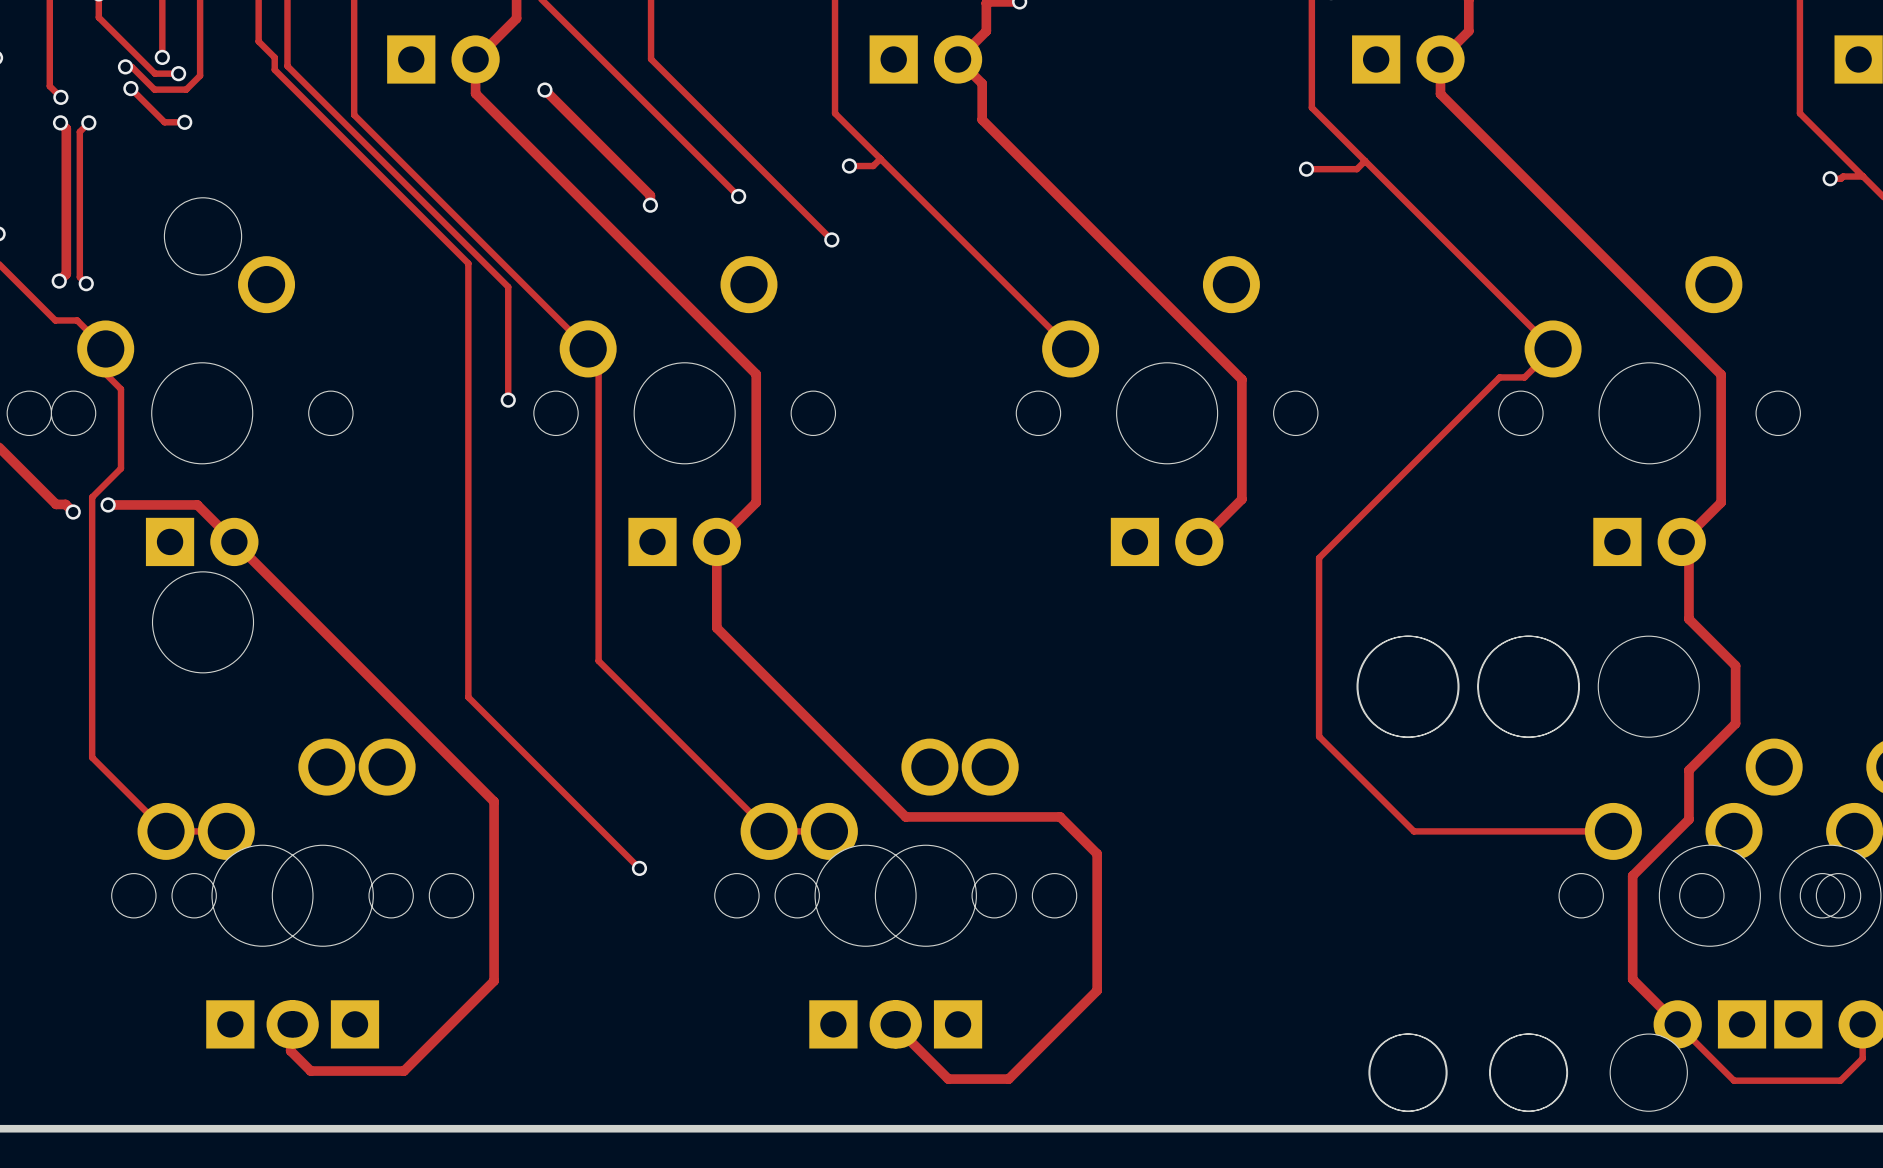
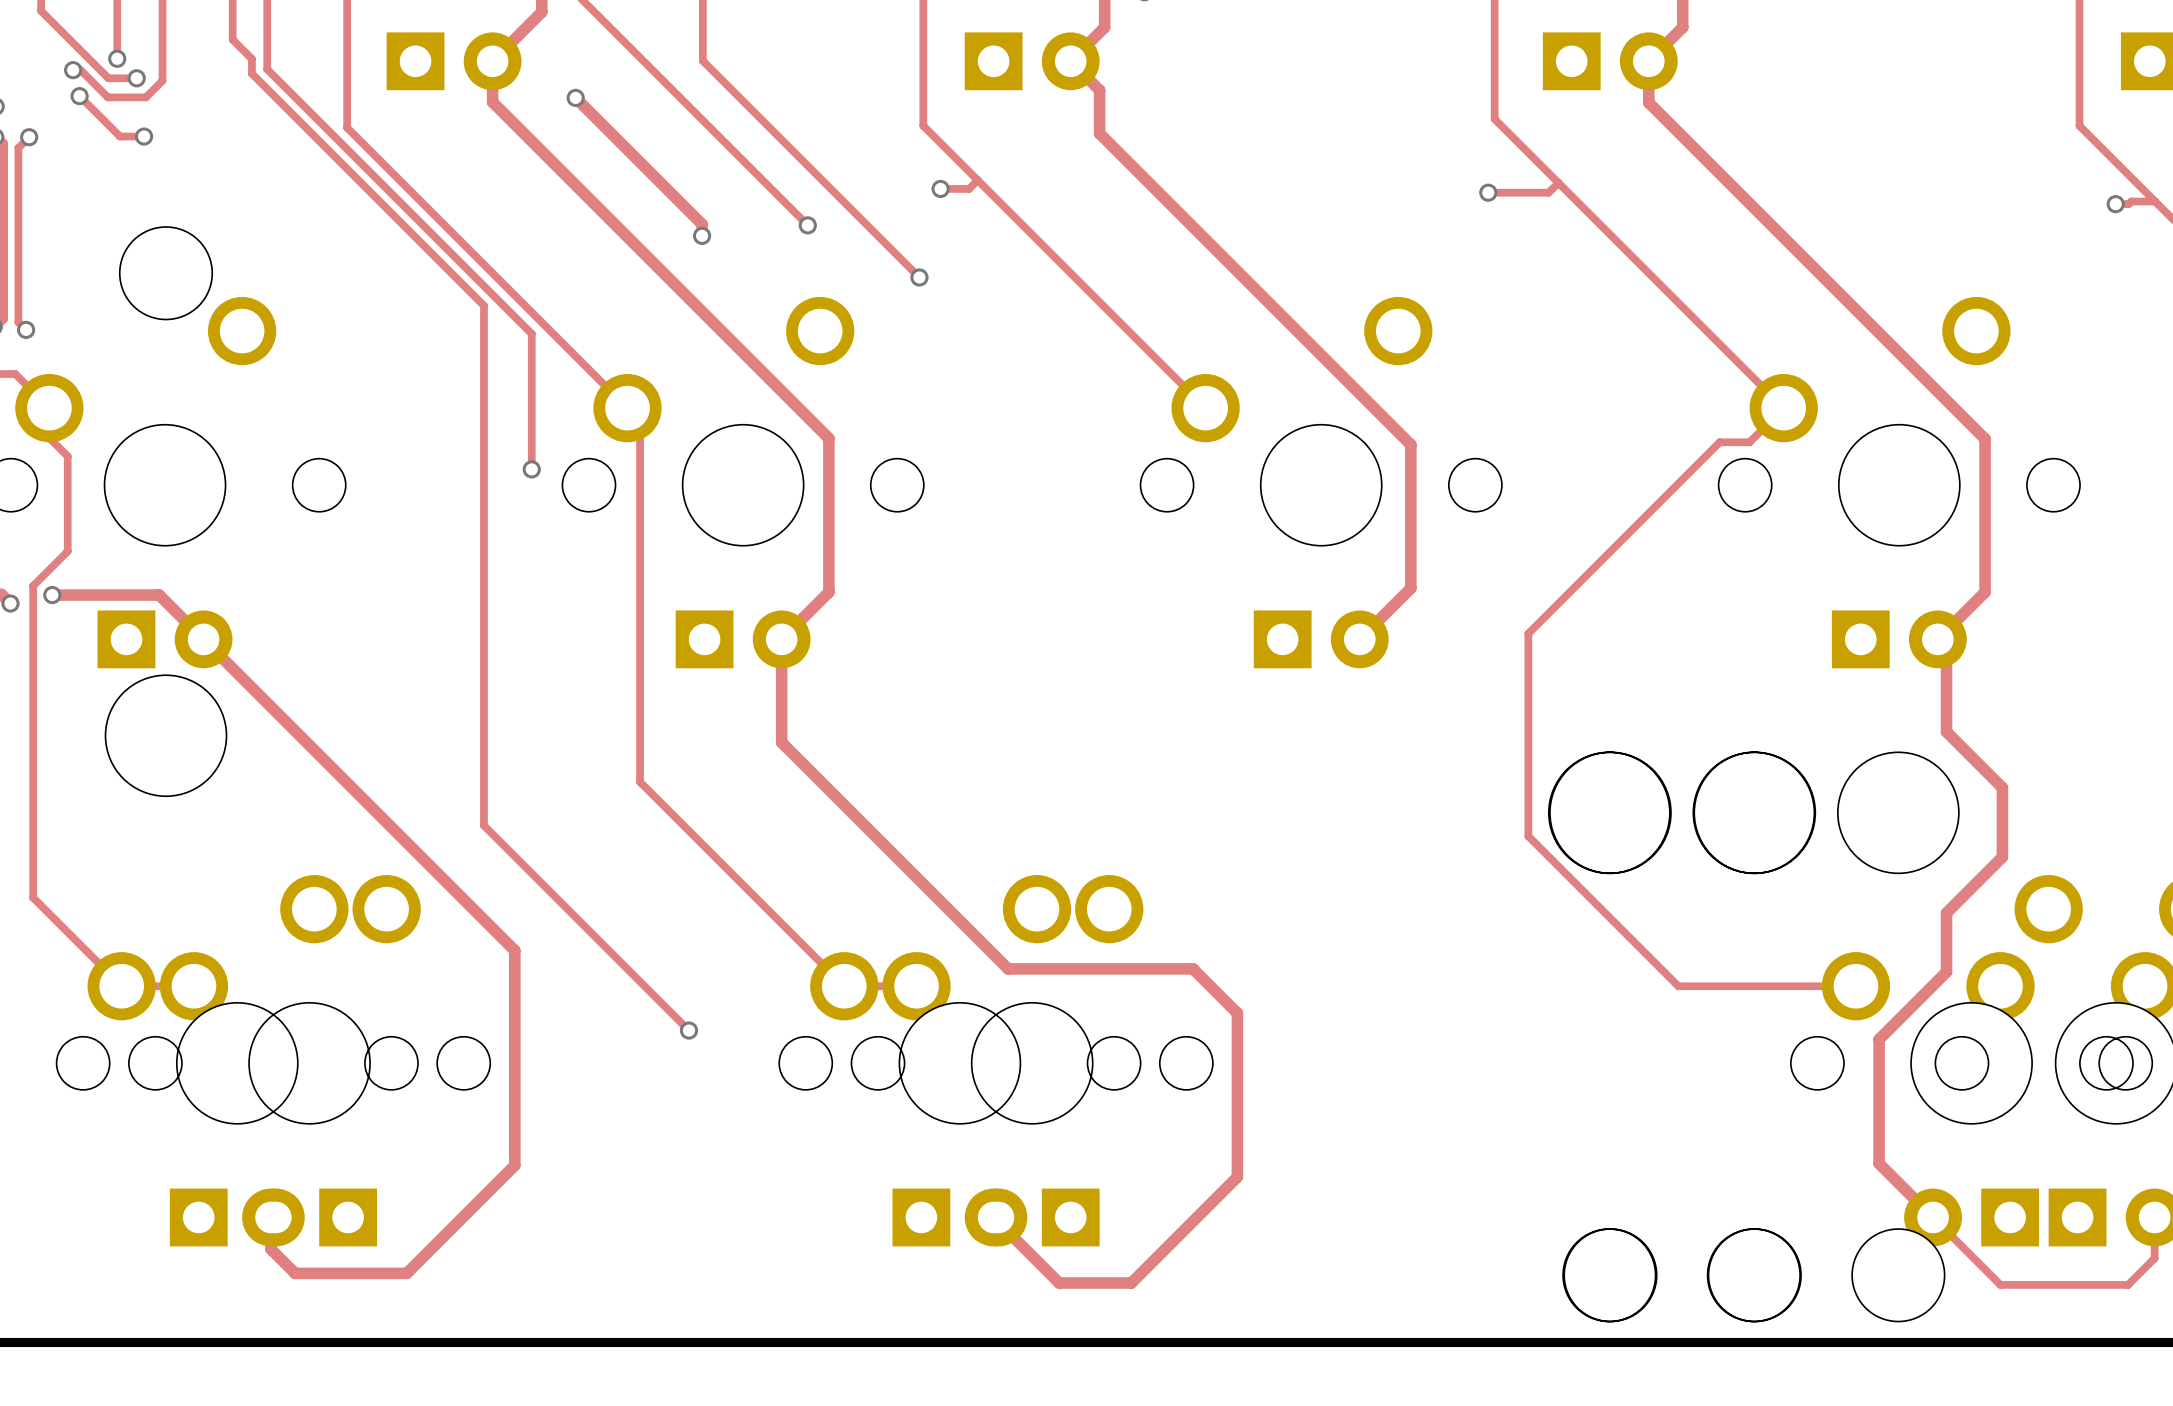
track: (1339, 537) (1319, 558) (1319, 736) (1413, 831) (1465, 831) -> (1528, 633) (1528, 836) (1678, 986)

